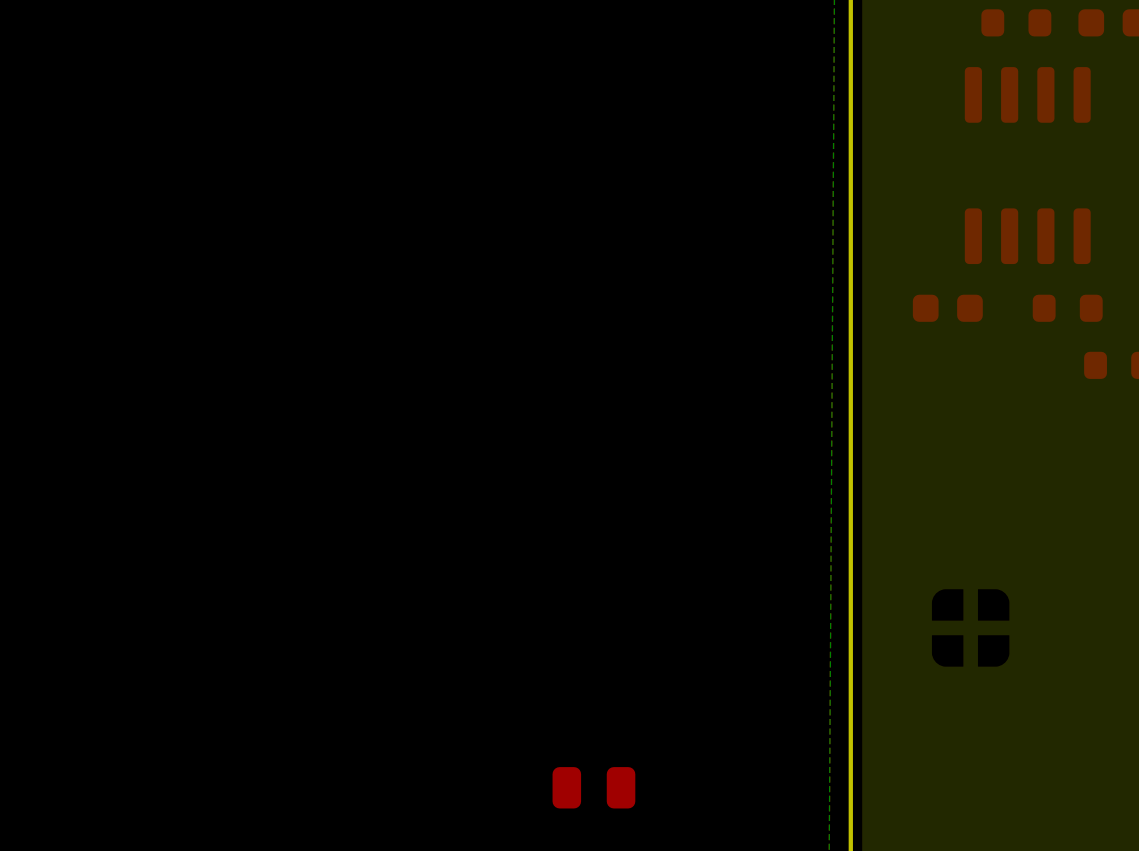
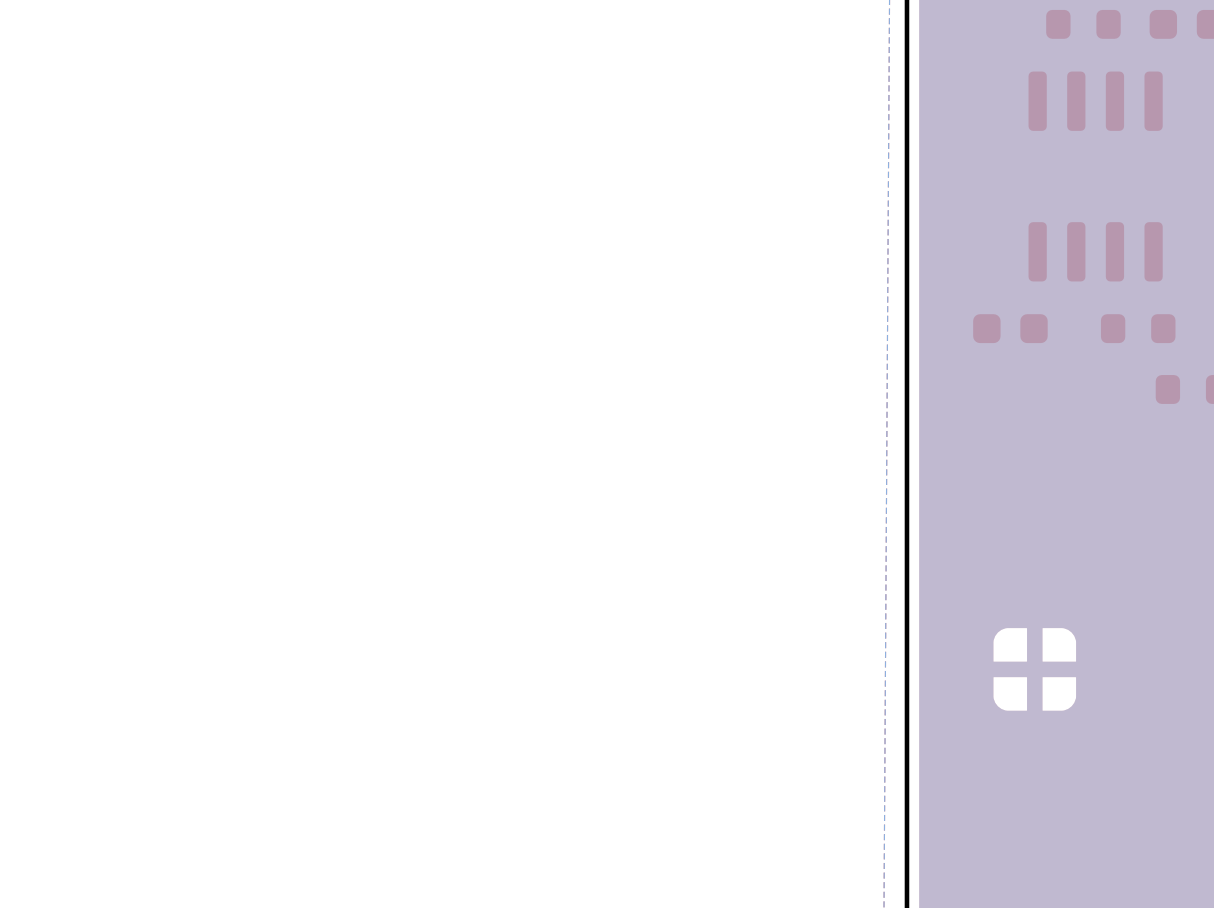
part: (593, 787) -> none

